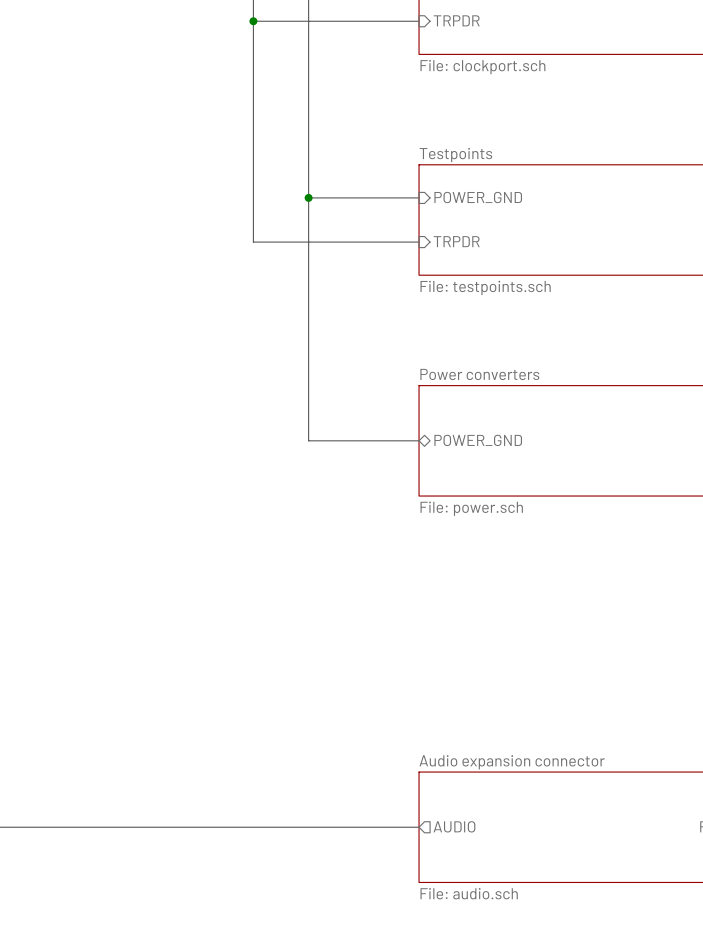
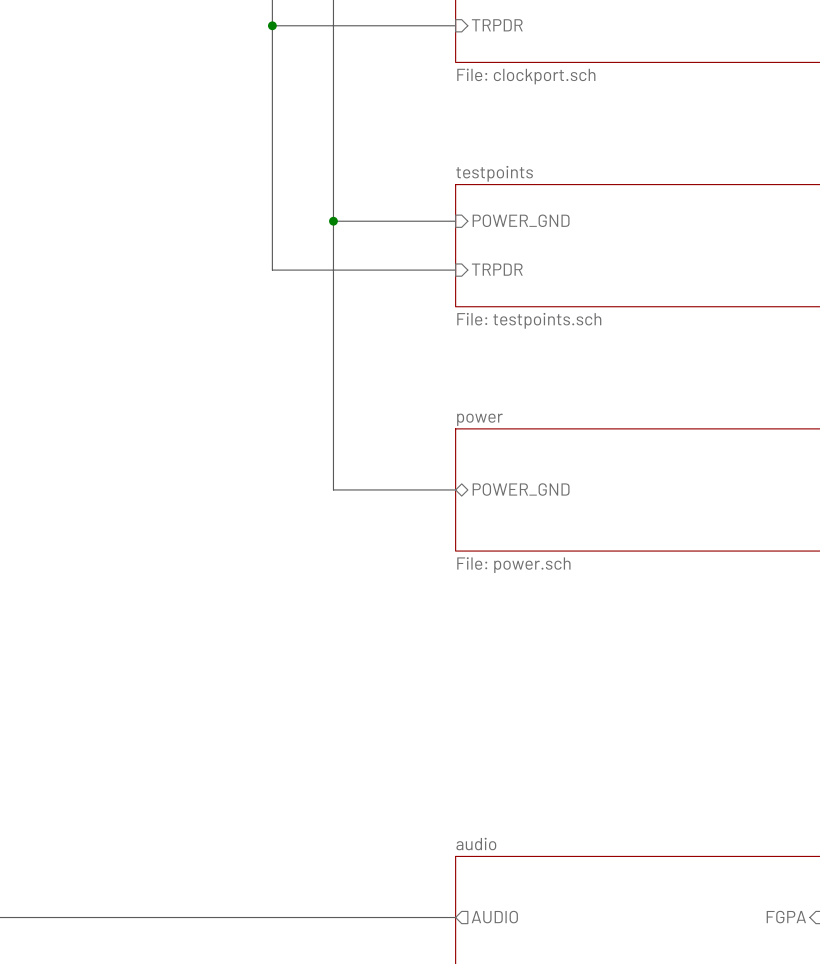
sheet Testpoints name: Testpoints (455, 155) -> testpoints (494, 173)
sheet Power converters name: Power converters (479, 374) -> power (479, 419)
sheet Audio expansion connector name: Audio expansion connector (512, 762) -> audio (476, 844)

